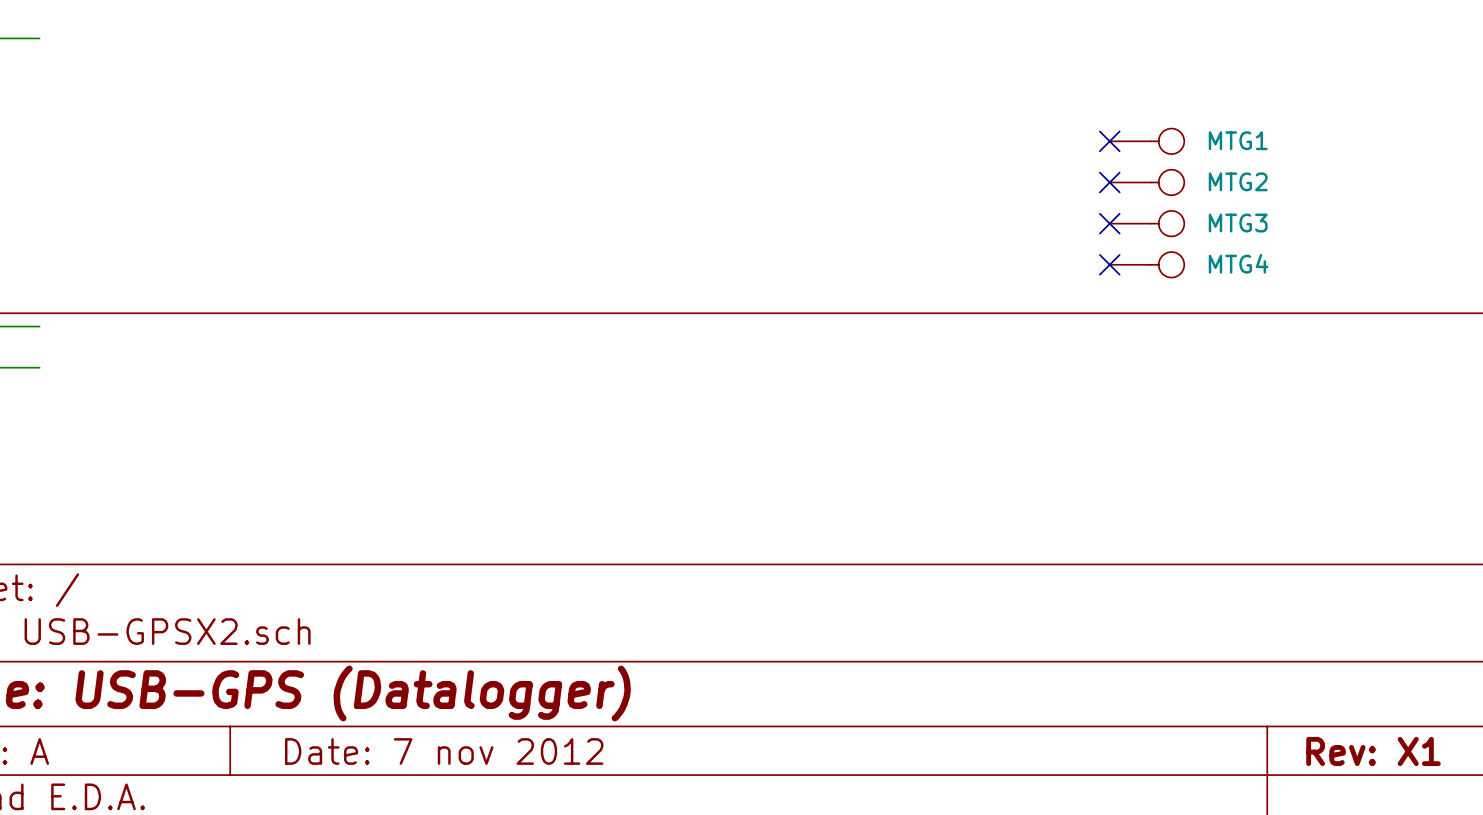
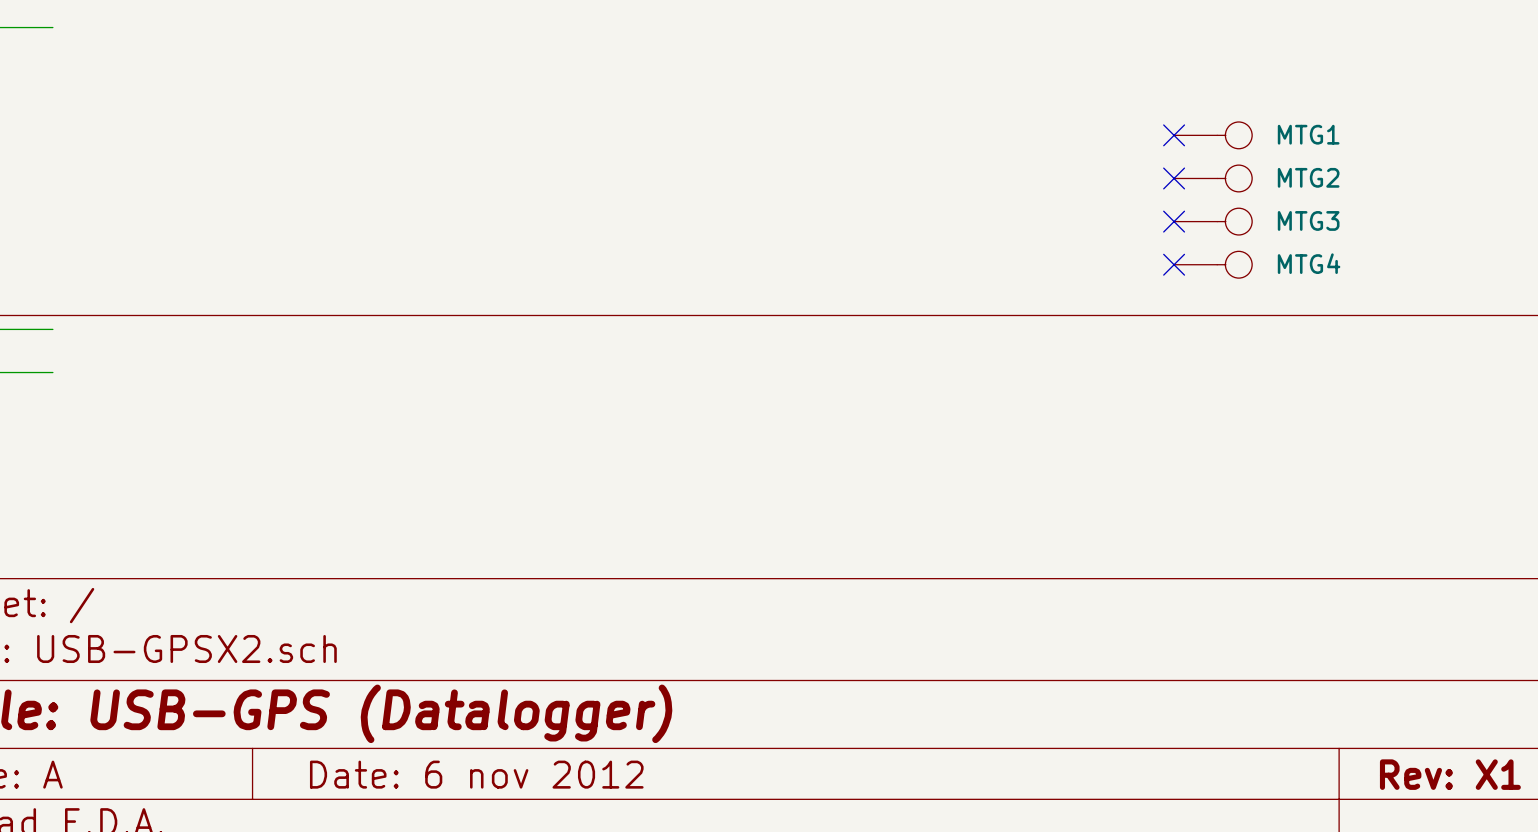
title block: Date: 7 nov 2012 (444, 751) -> Date: 6 nov 2012 (476, 774)

